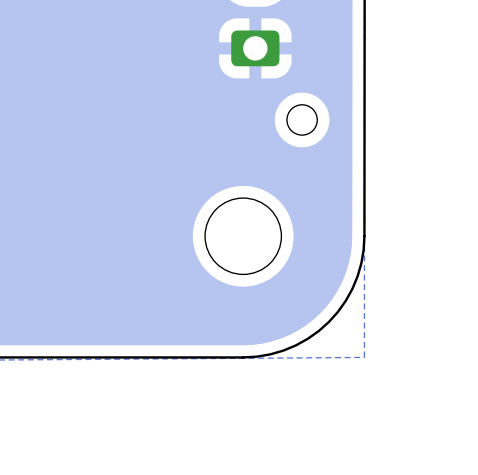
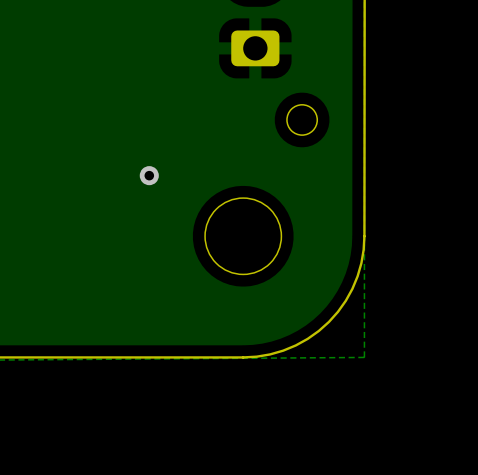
via: none -> (149, 175)

